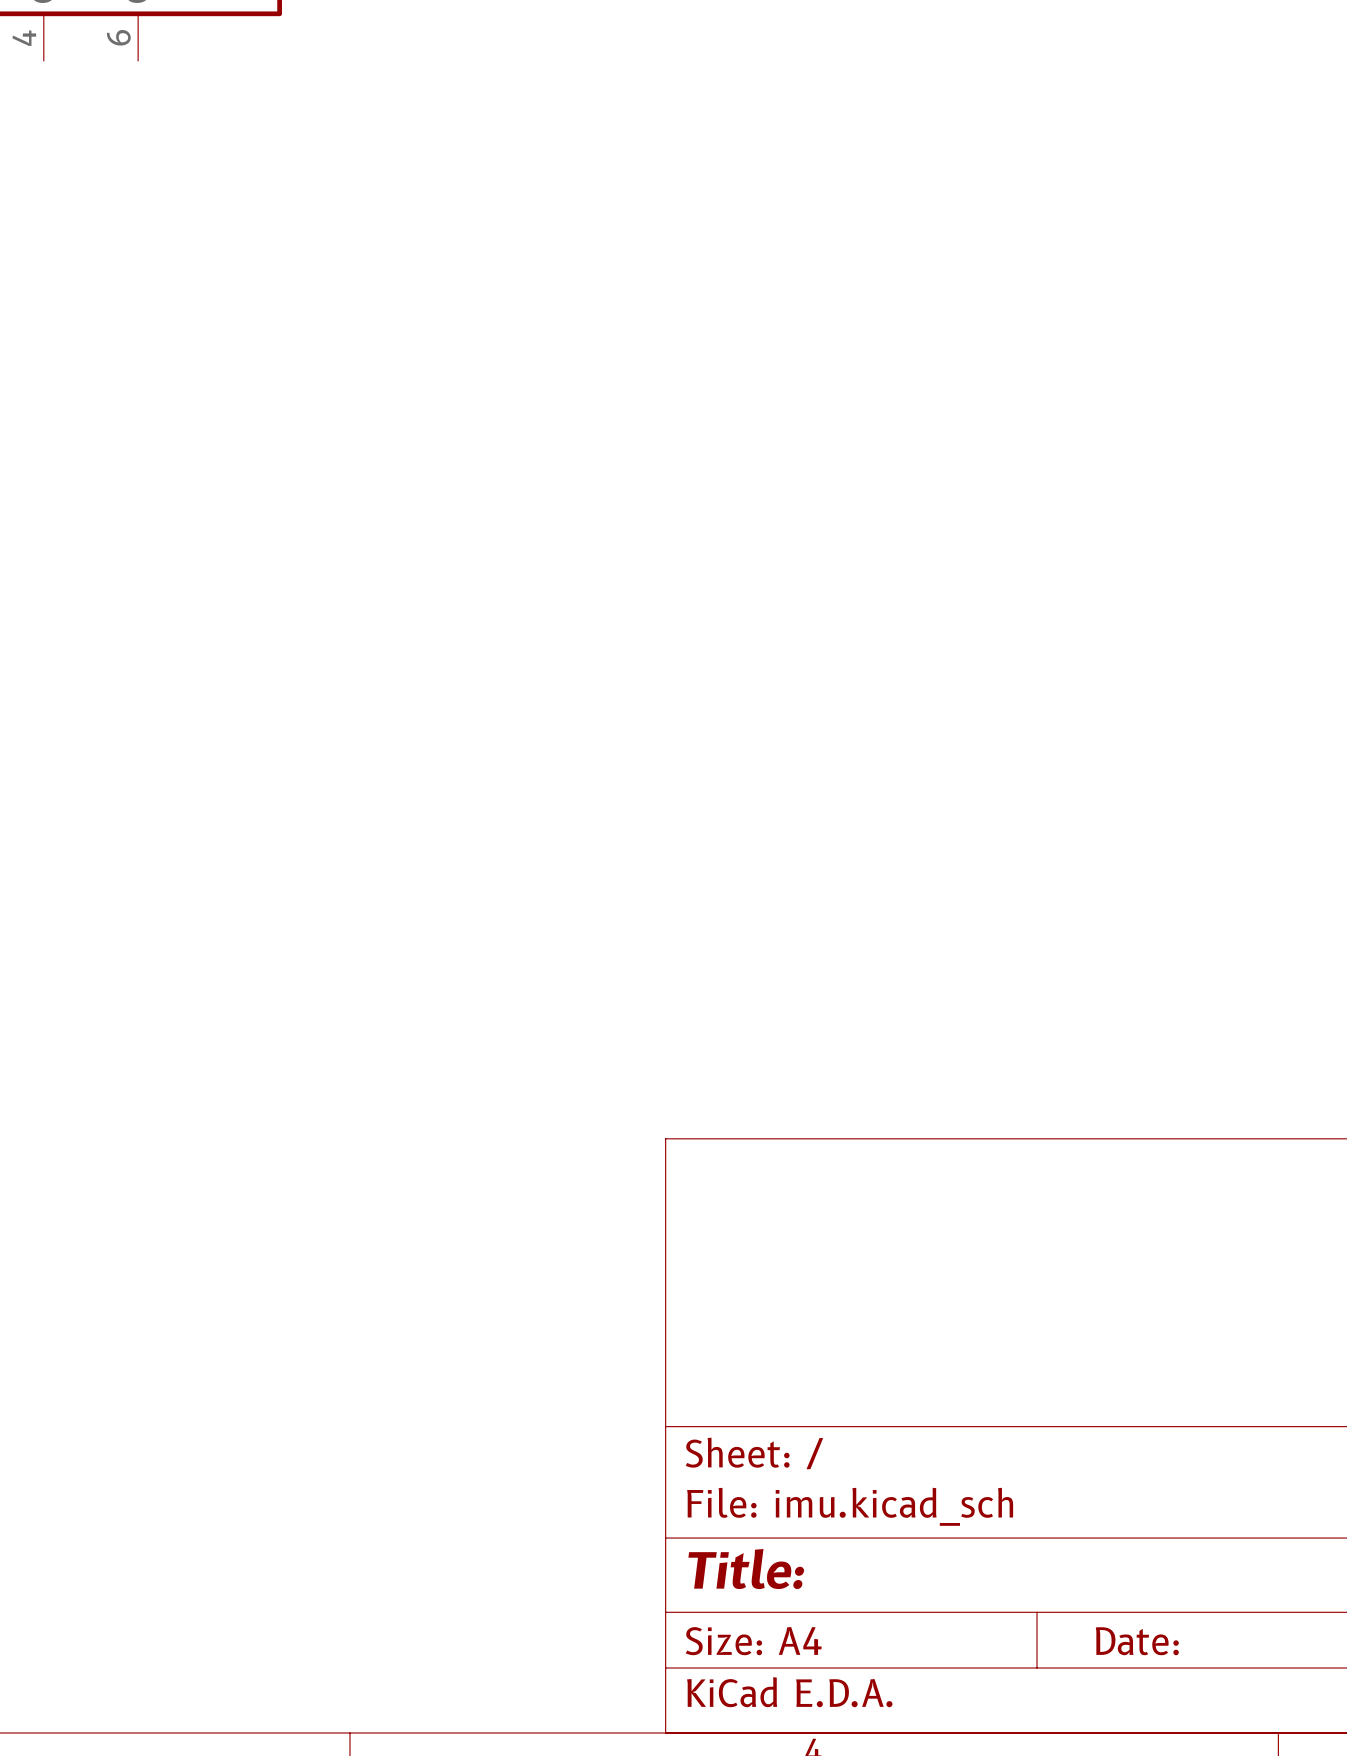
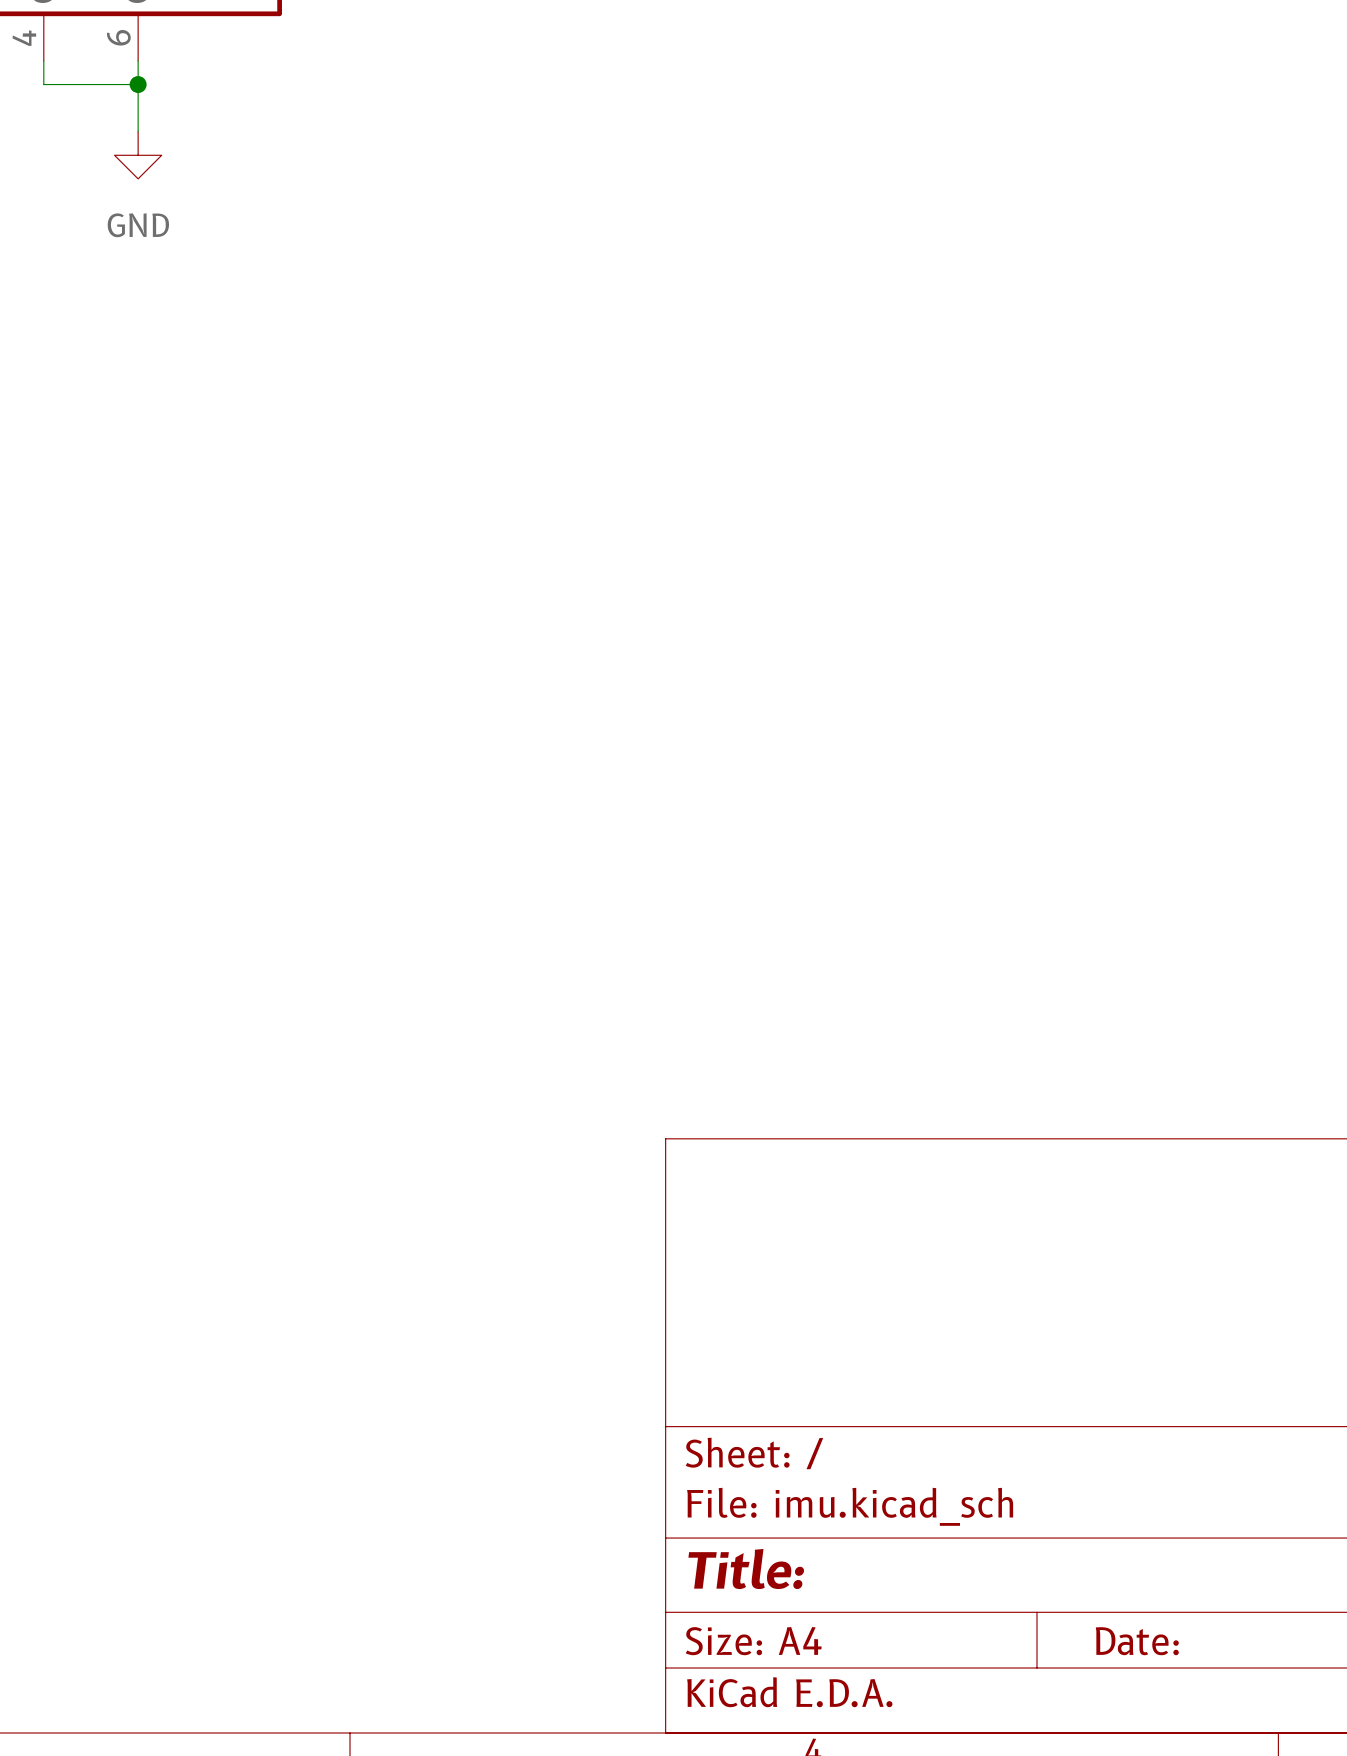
wire: none -> (43, 60) (43, 84) (138, 84)
wire: none -> (138, 60) (138, 131)
junction: none -> (138, 84)
power symbol: none -> GND (138, 155)

